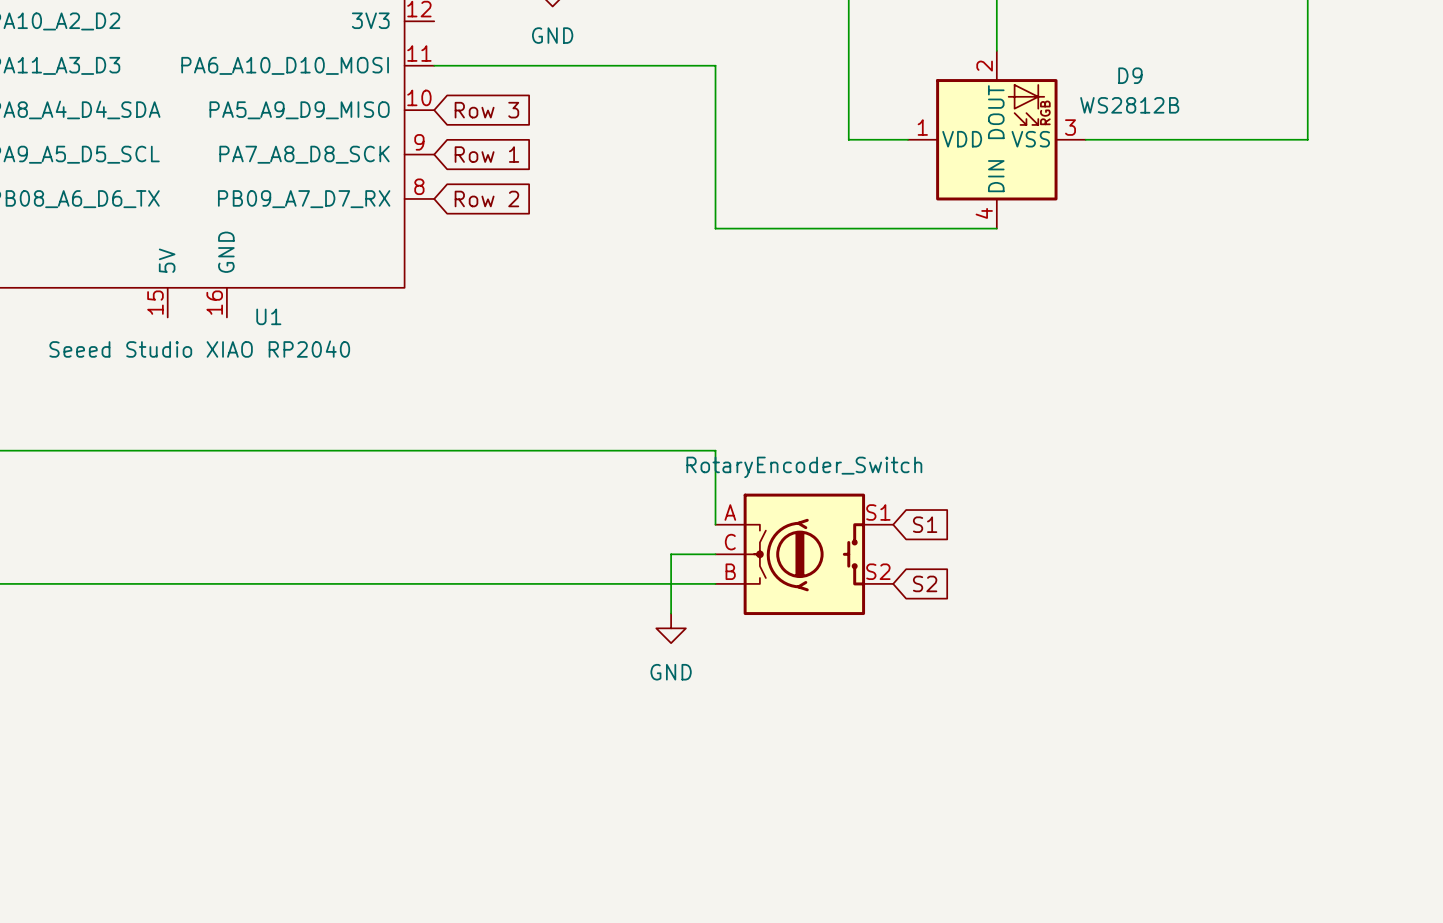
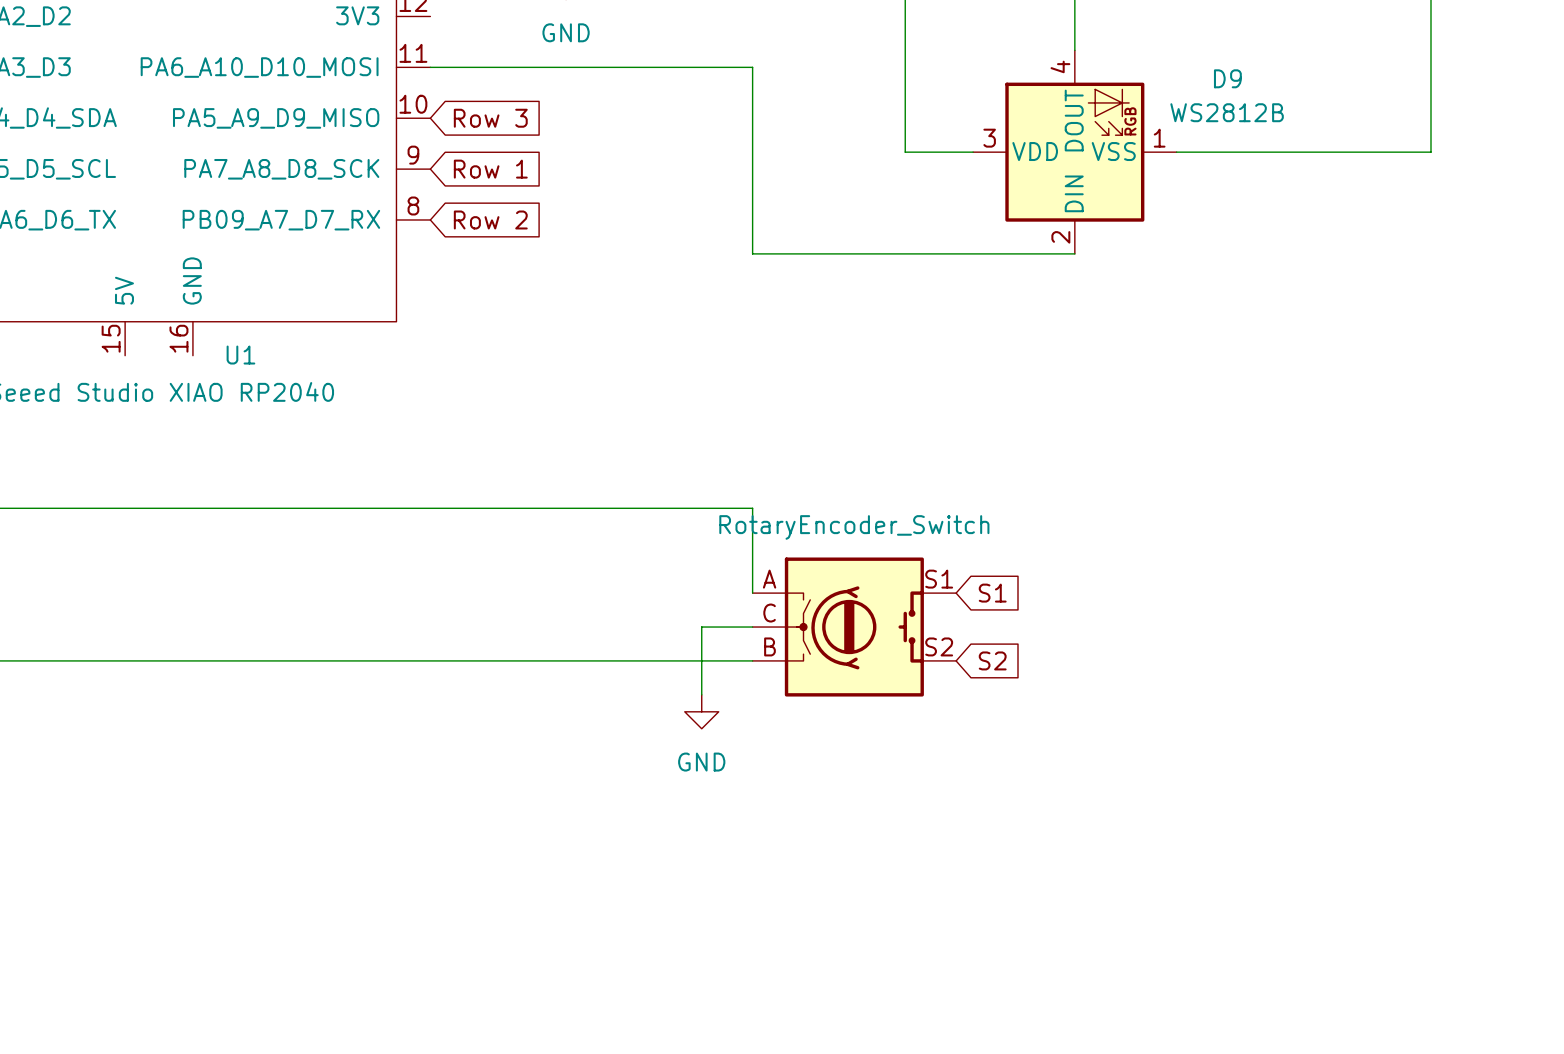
D9 pin number: 2 (984, 66) -> 4 (1060, 66)
D9 pin number: 1 (922, 127) -> 3 (989, 138)
D9 pin number: 3 (1070, 127) -> 1 (1159, 138)
D9 pin number: 4 (984, 213) -> 2 (1060, 237)

